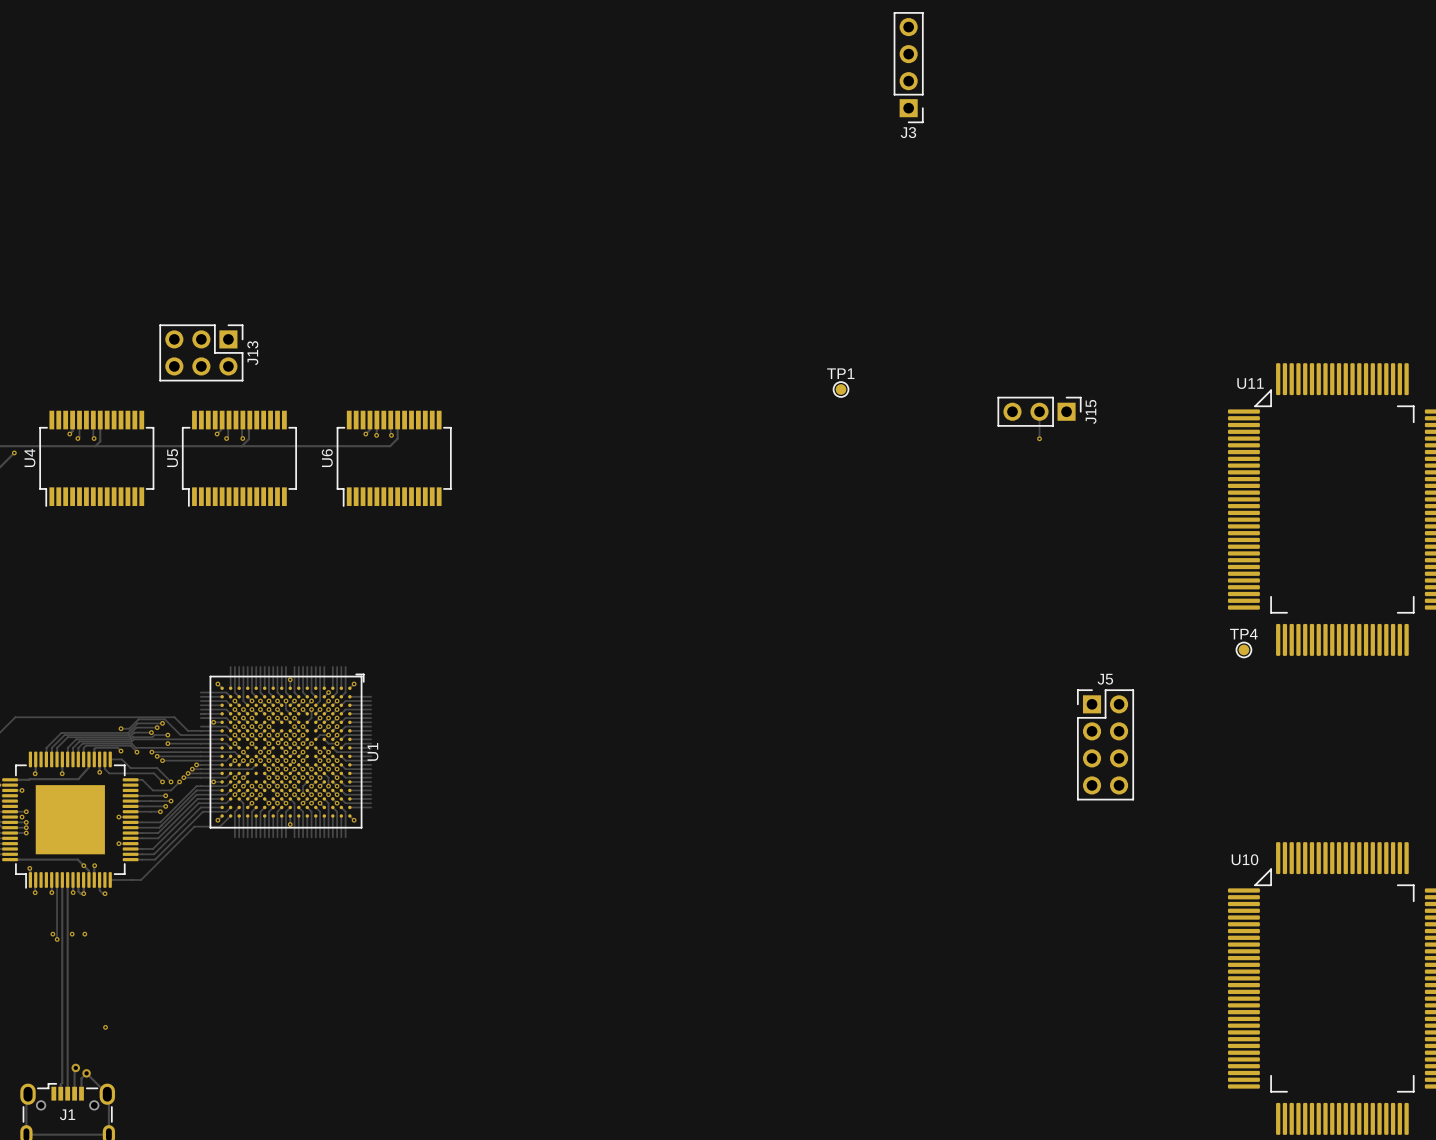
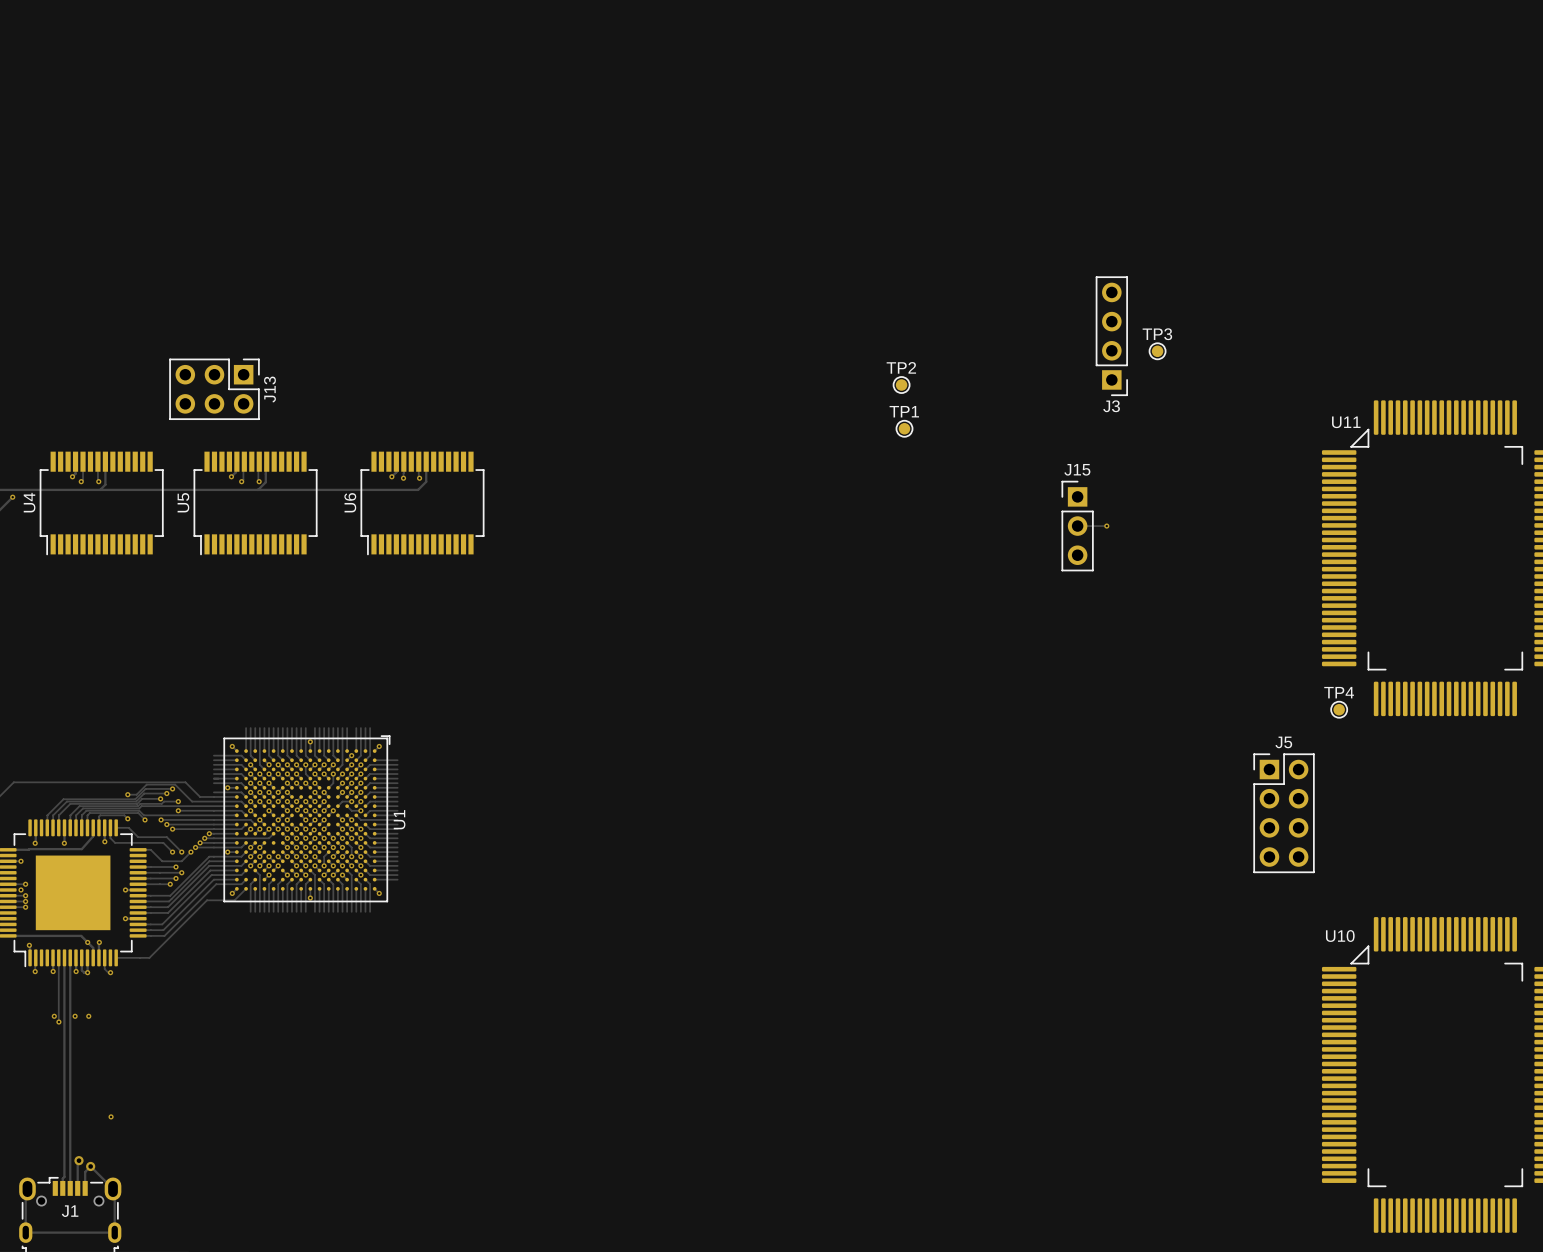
J3 position: (908, 67) -> (1111, 336)
TP3: none -> (1157, 351)
TP2: none -> (901, 385)
track: (1039, 411) (1039, 438) -> none
J15 rotation: 0° (1039, 411) -> 90° counterclockwise (1077, 526)
J15 position: (1039, 411) -> (1077, 526)
via position: (1039, 438) -> (1106, 526)
track: none -> (1077, 526) (1106, 526)
J5 position: (1105, 744) -> (1284, 813)

